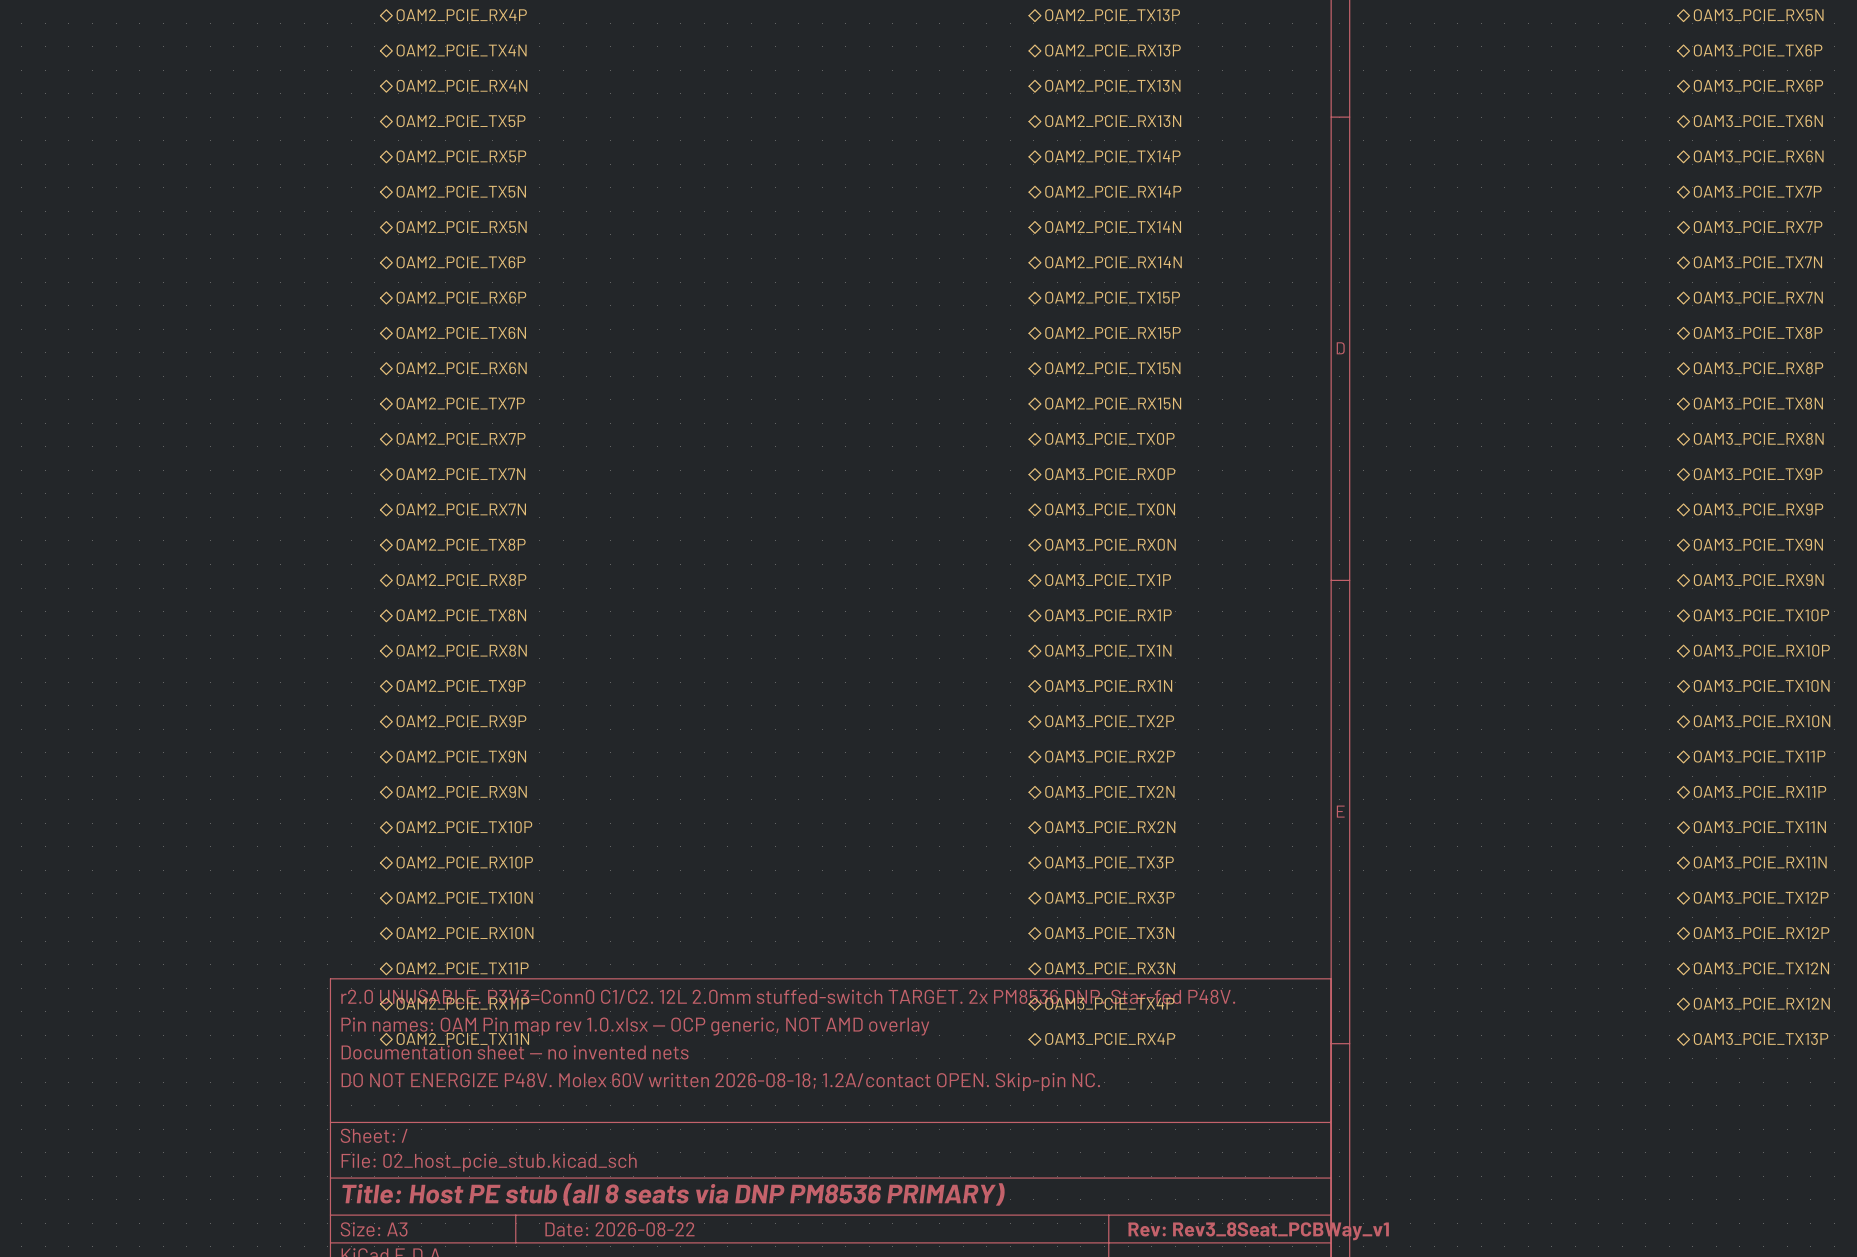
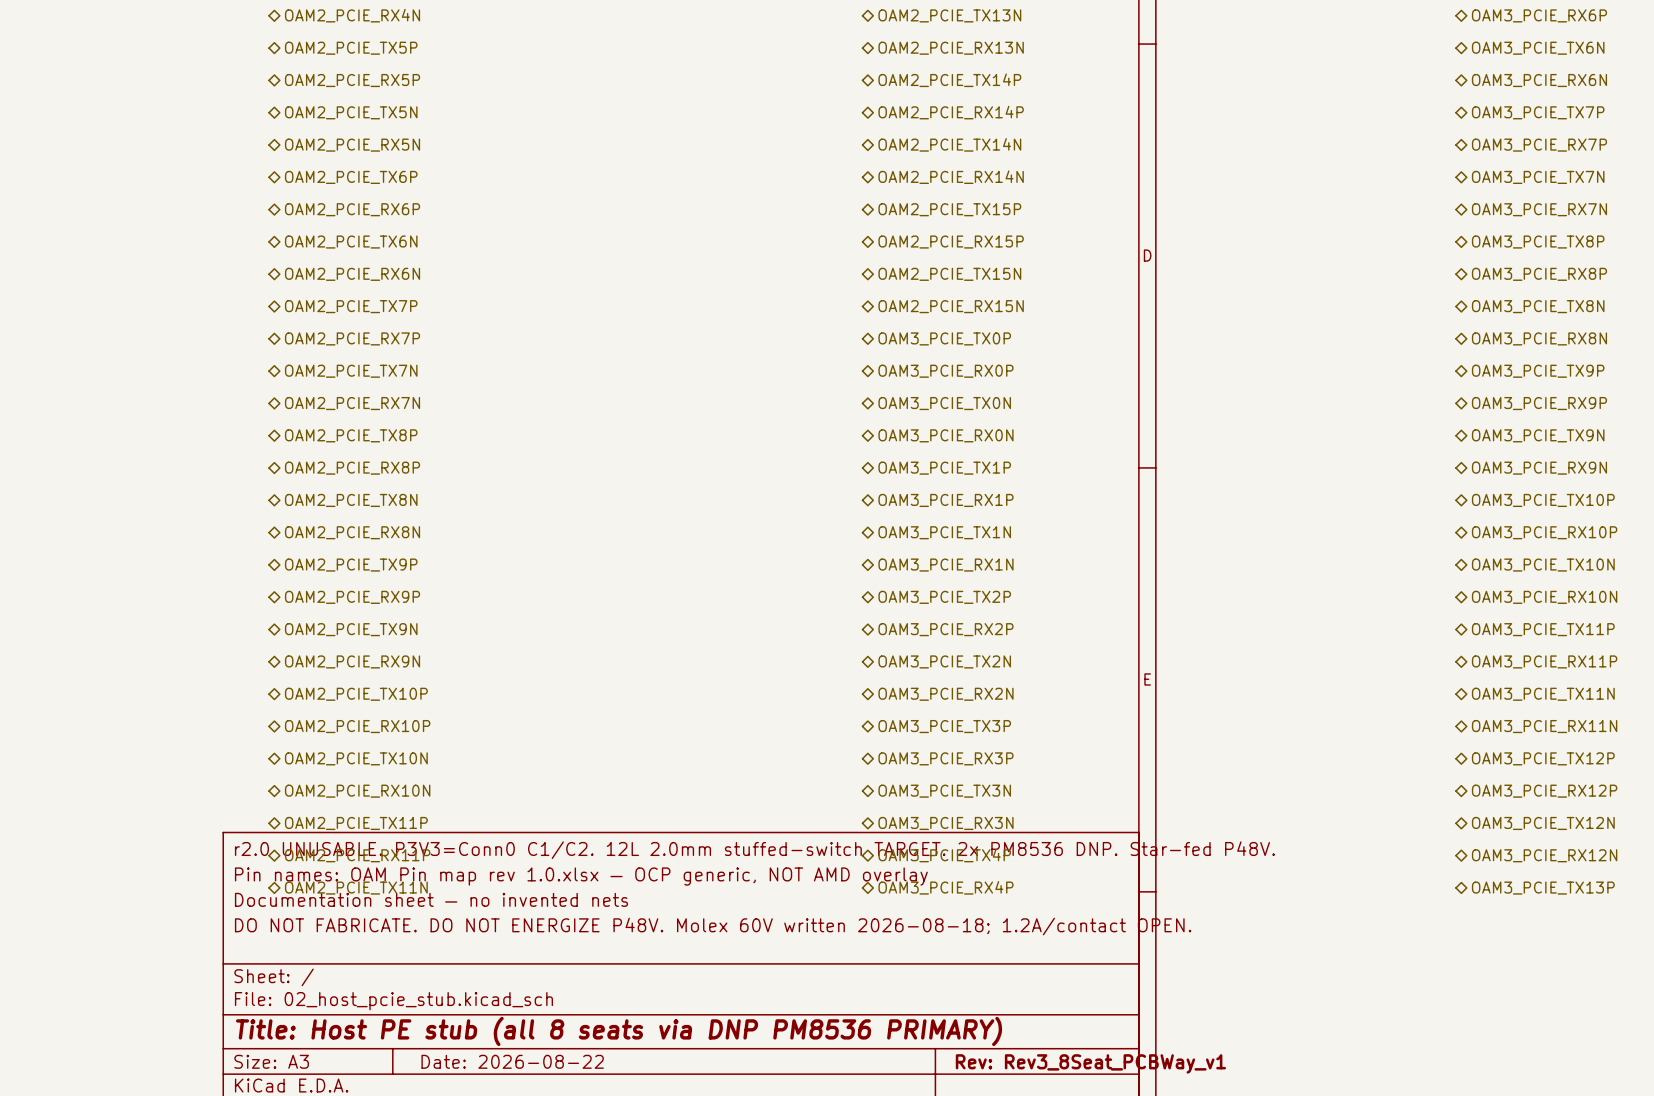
title block: DO NOT ENERGIZE P48V. Molex 60V written 2026-08-18; 1.2A/contact OPEN. Skip-pin NC. (720, 1082) -> DO NOT FABRICATE. DO NOT ENERGIZE P48V. Molex 60V written 2026-08-18; 1.2A/contact OPEN. (713, 926)

